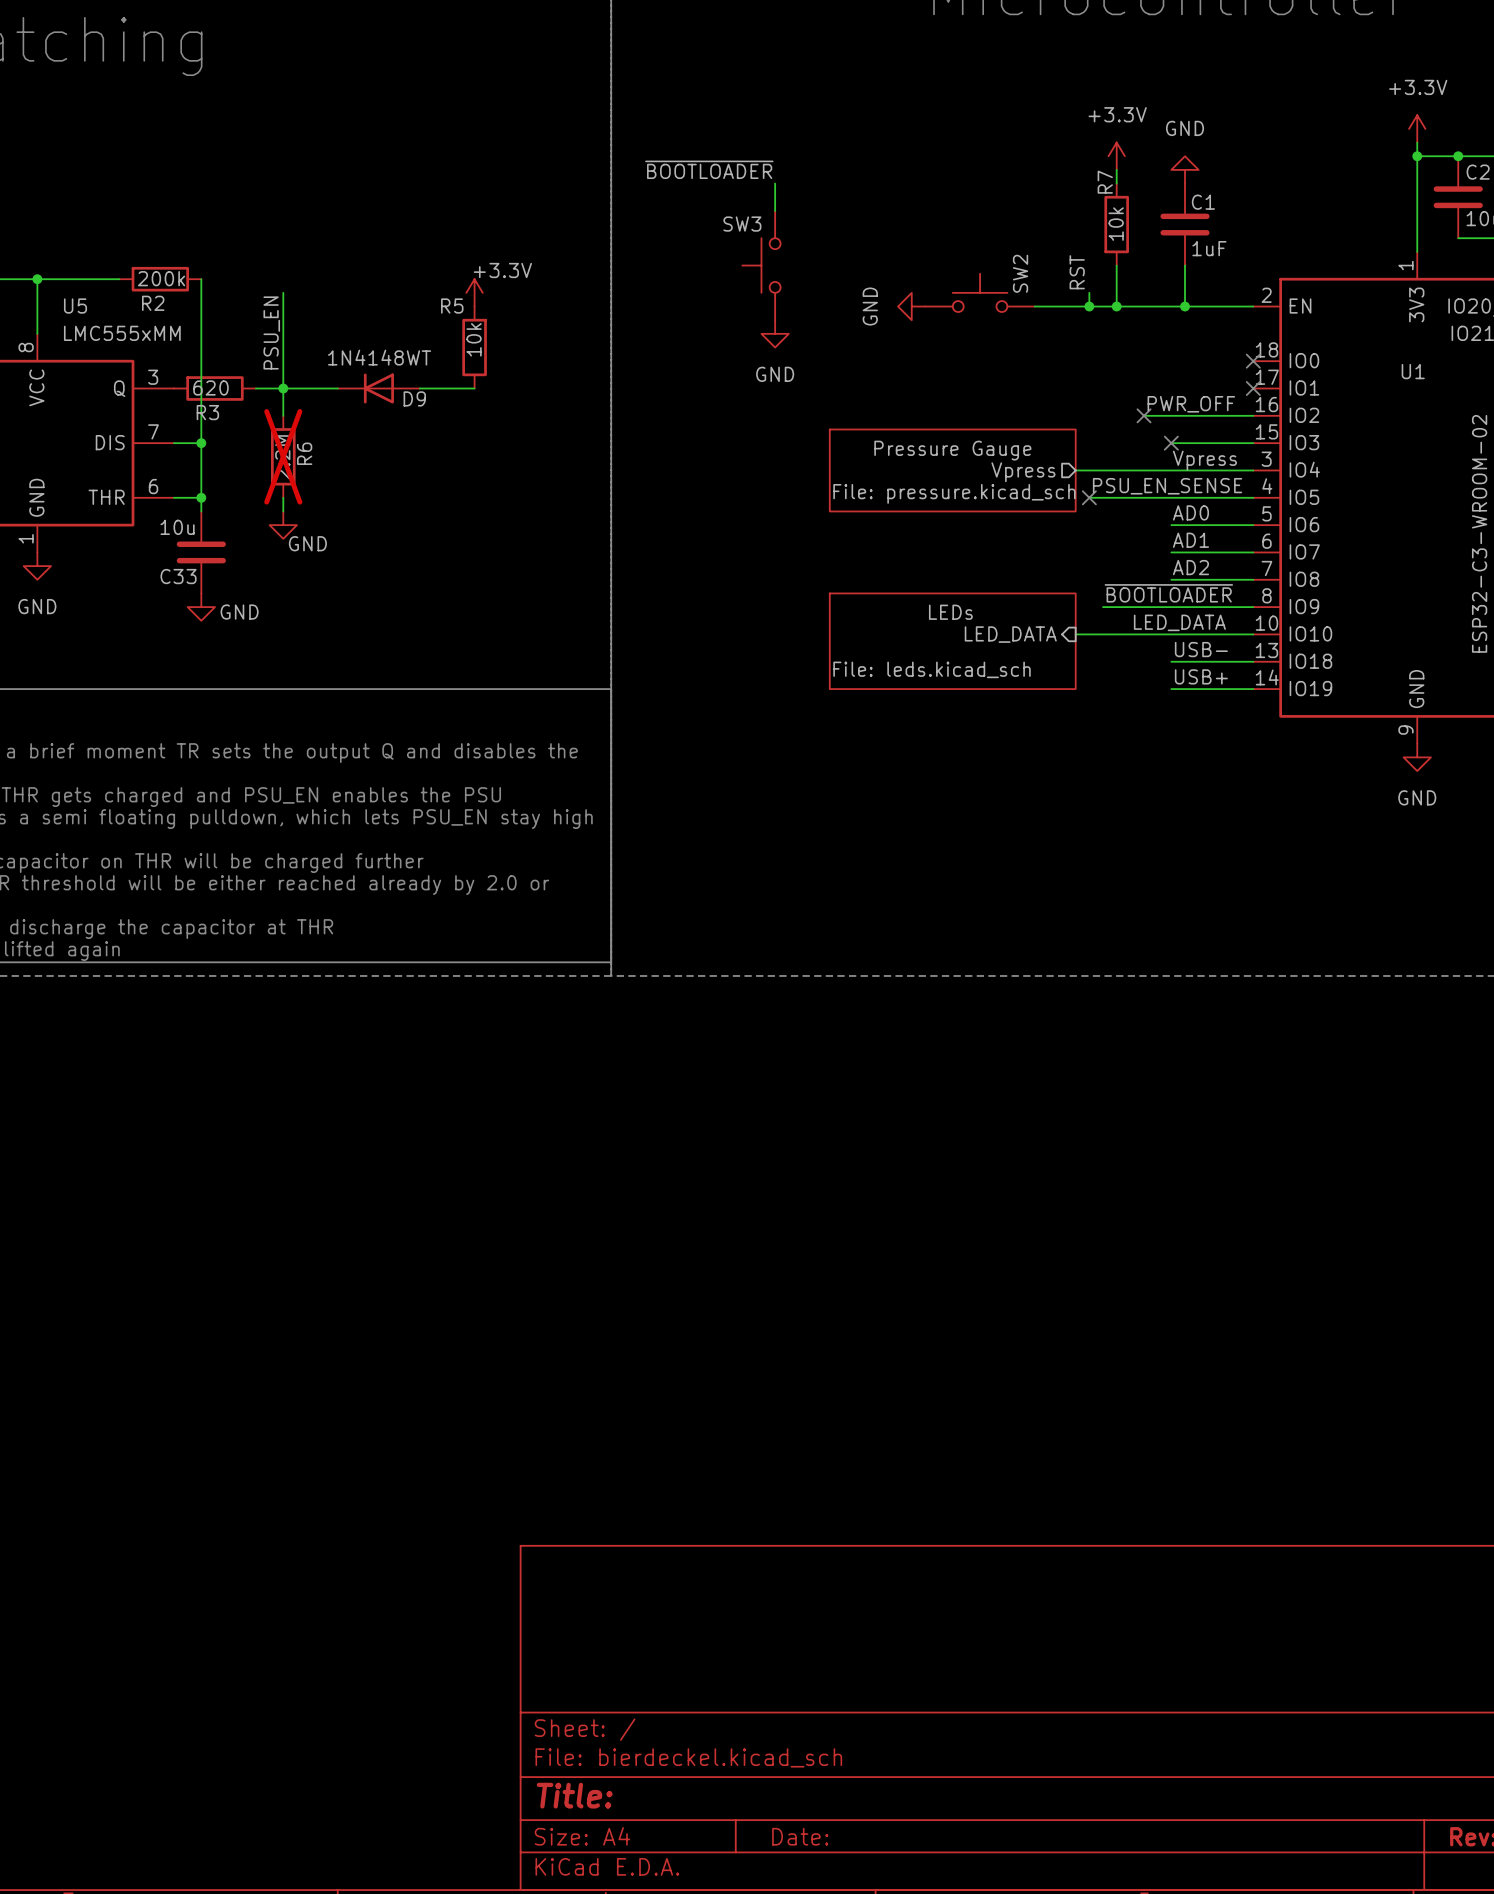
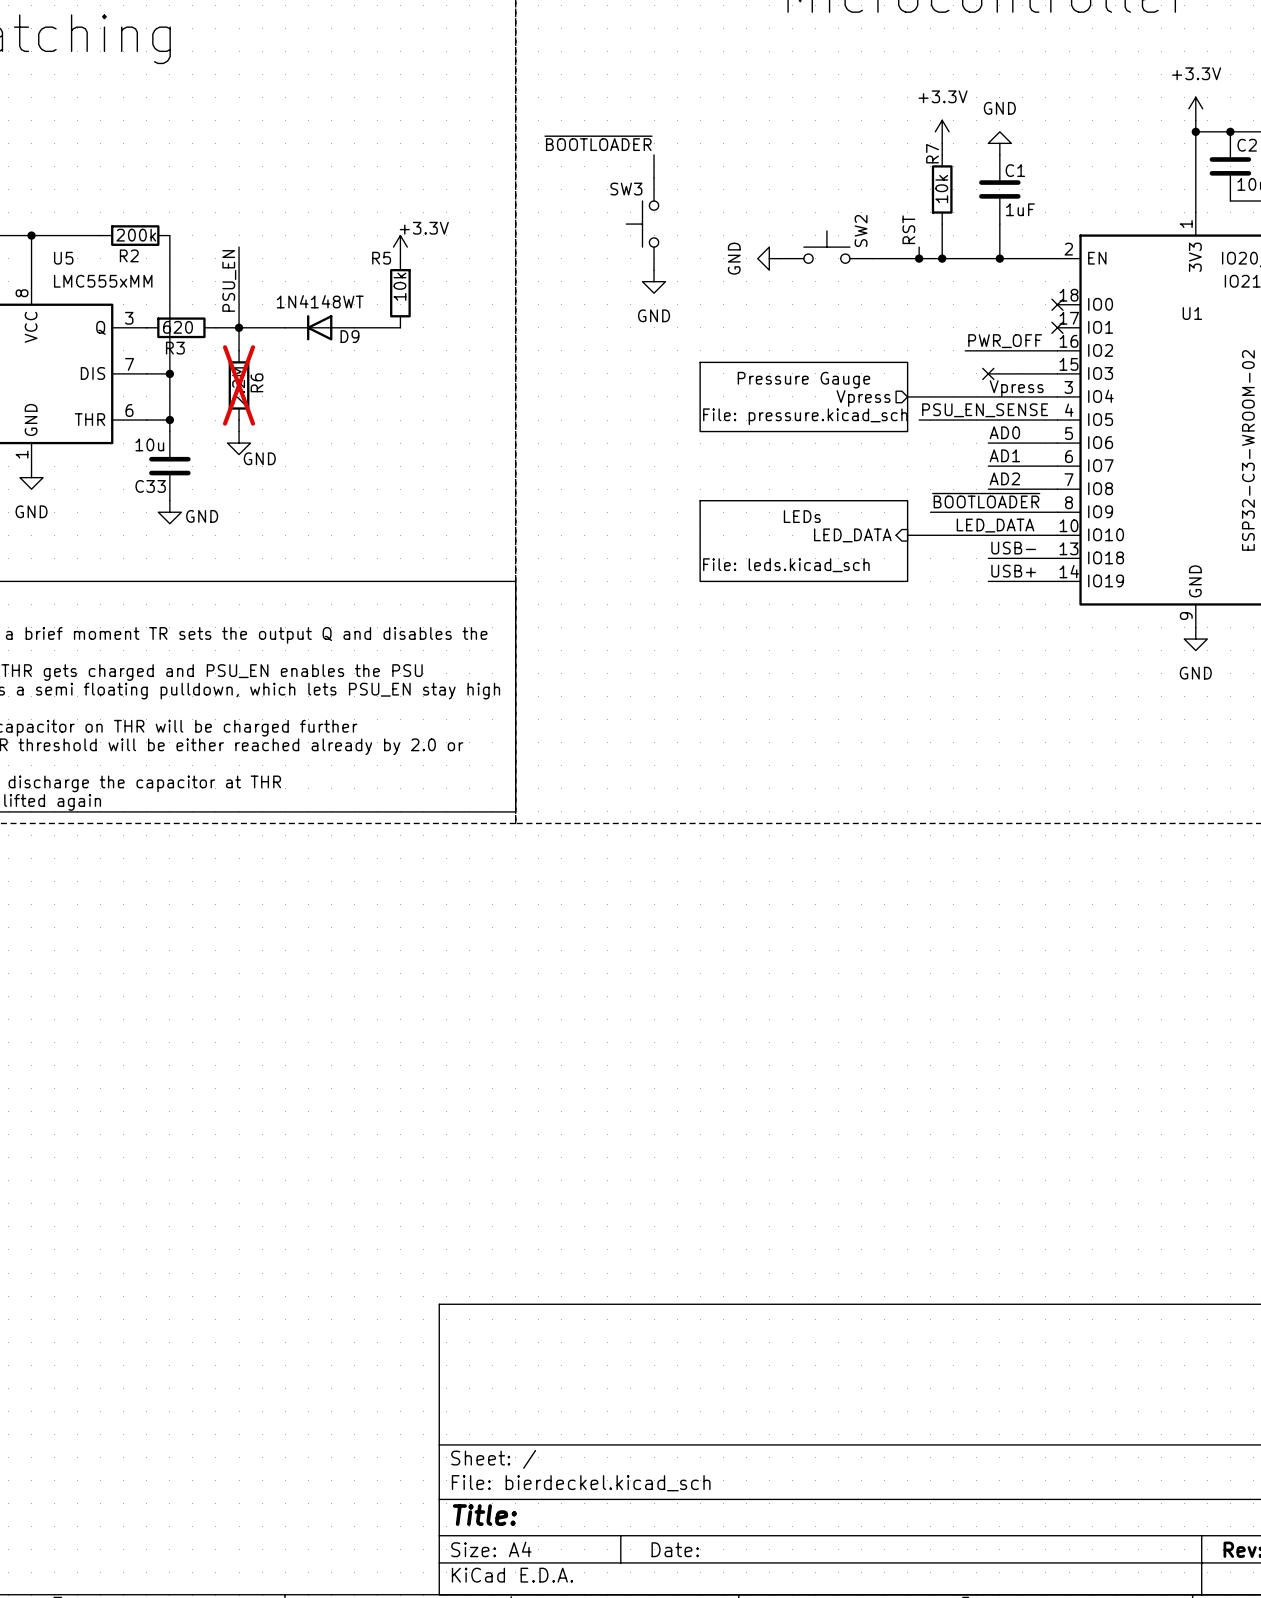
no-connect mark: (1144, 415) -> none
no-connect mark: (1089, 497) -> none

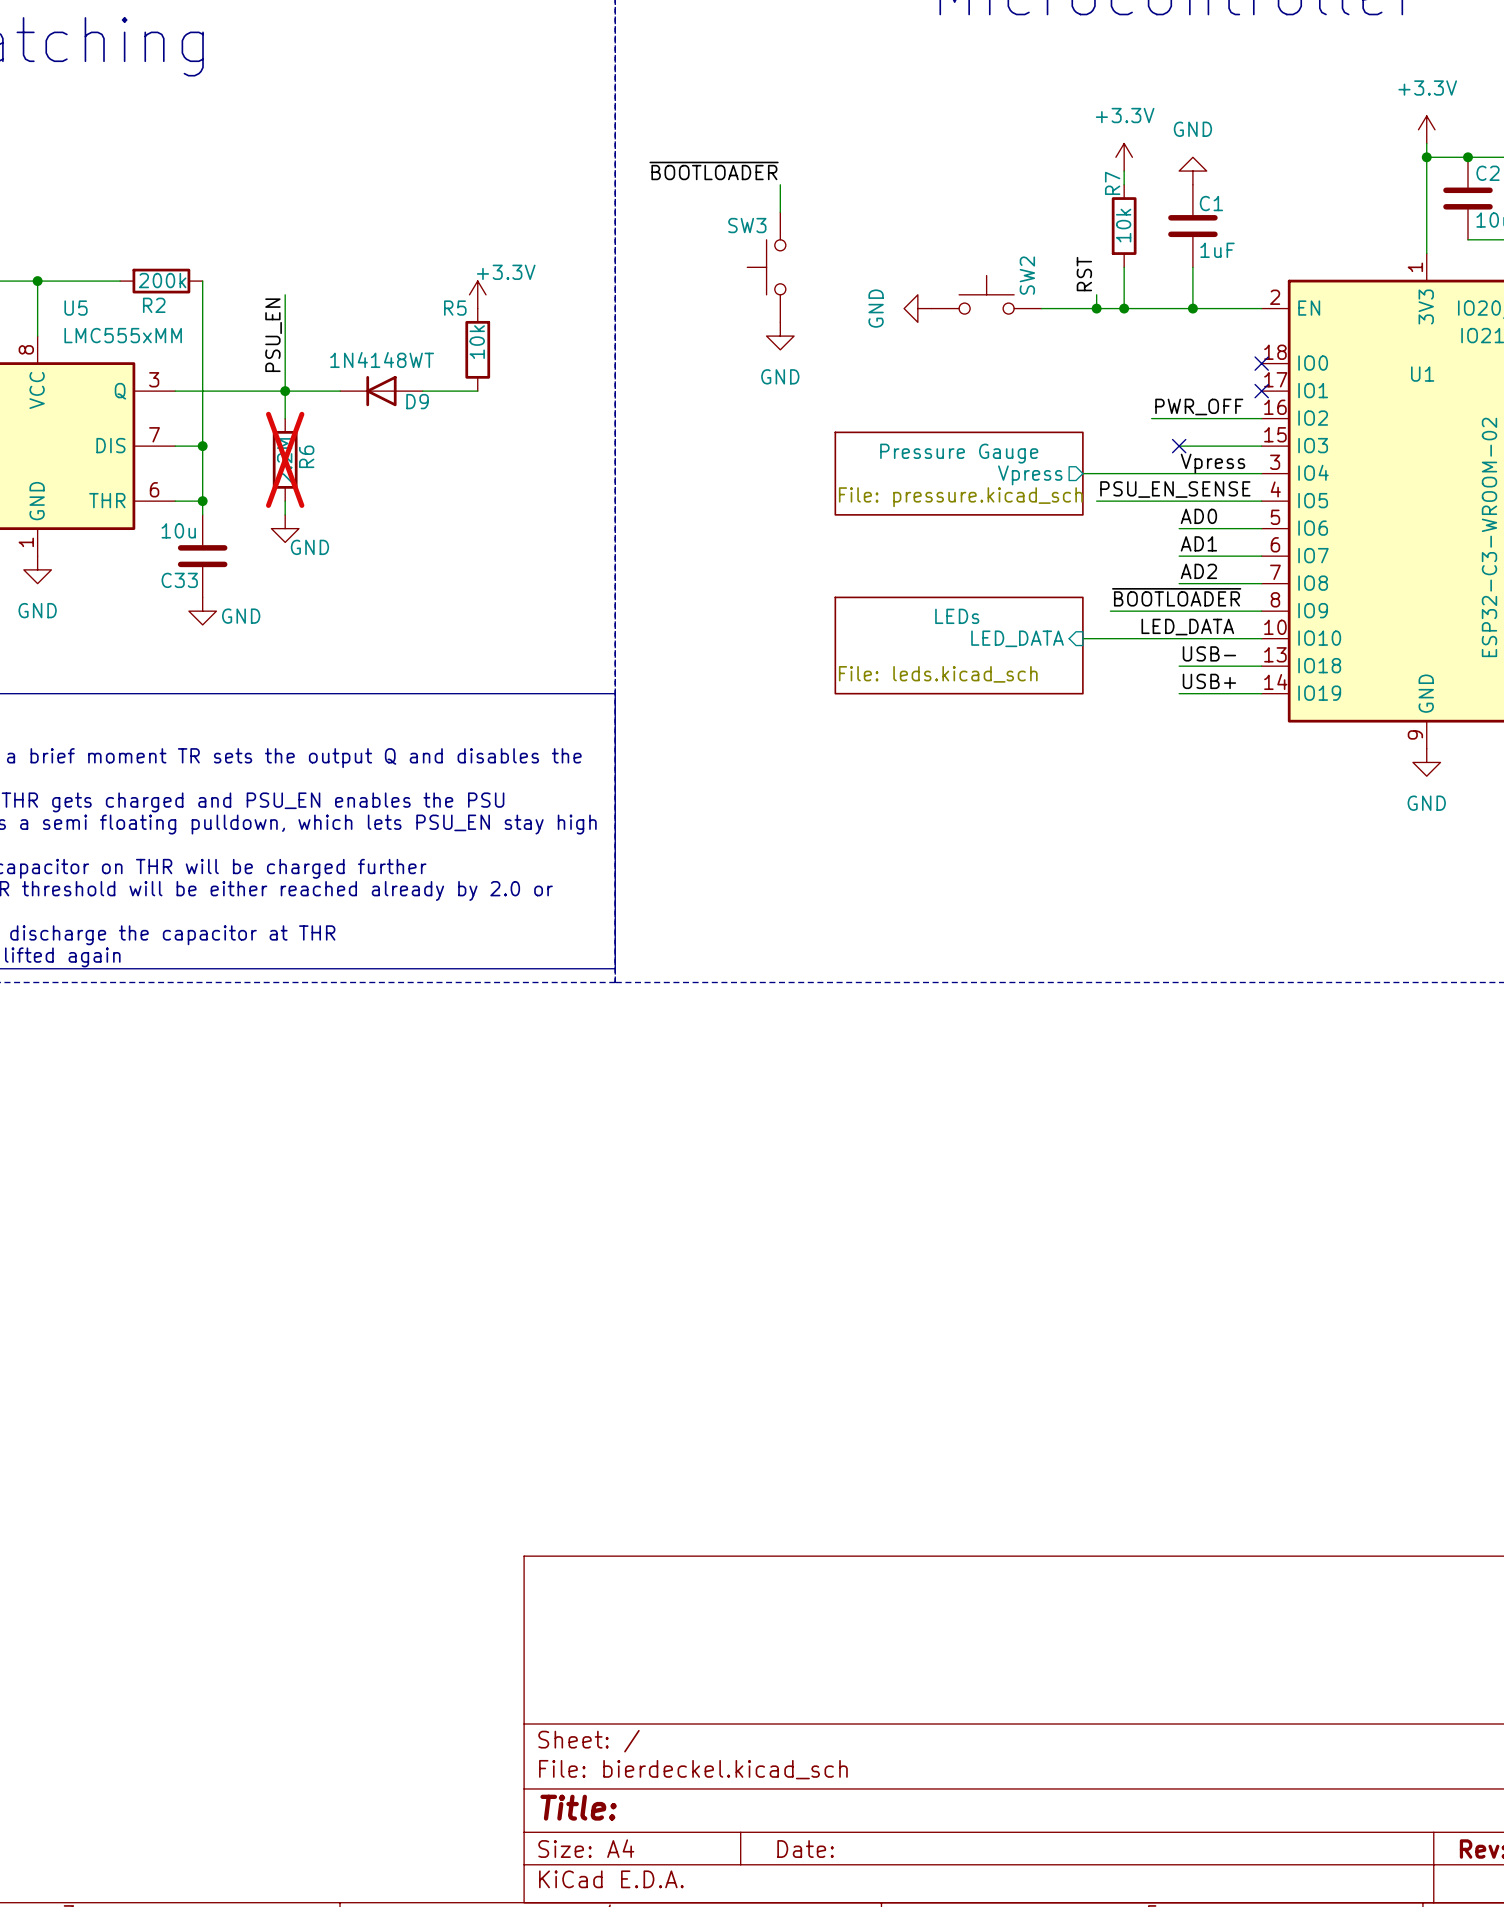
wire: none -> (175, 391) (257, 391)
R3: 620 (181, 327) -> none

